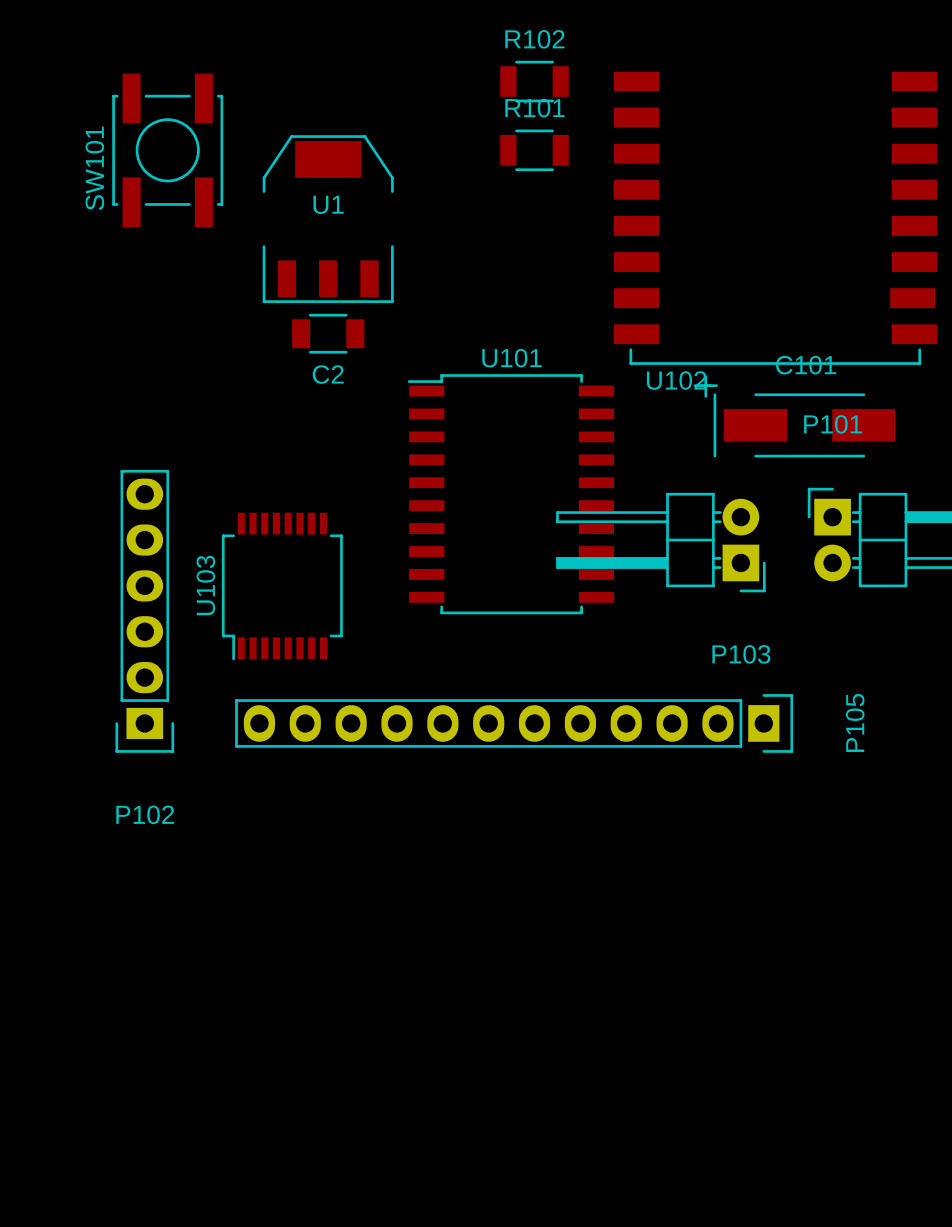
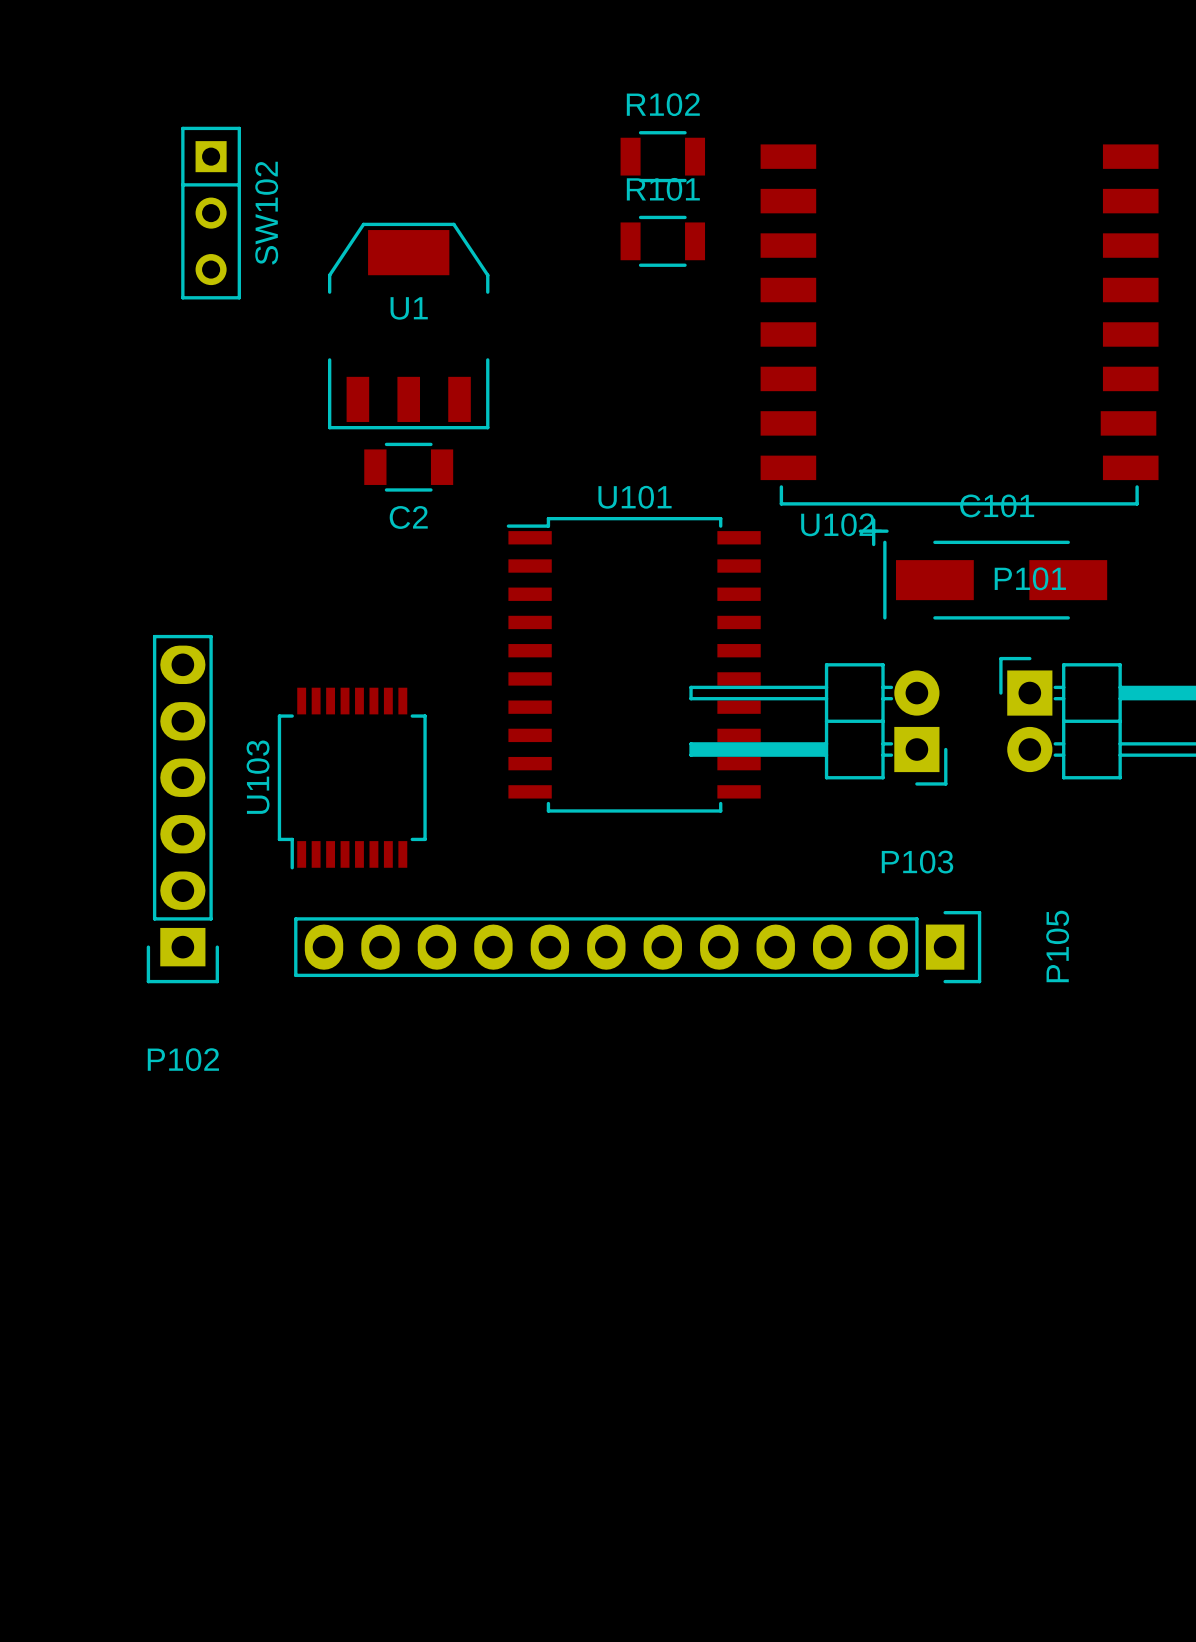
SW102: none -> (211, 213)
SW101: (167, 150) -> none

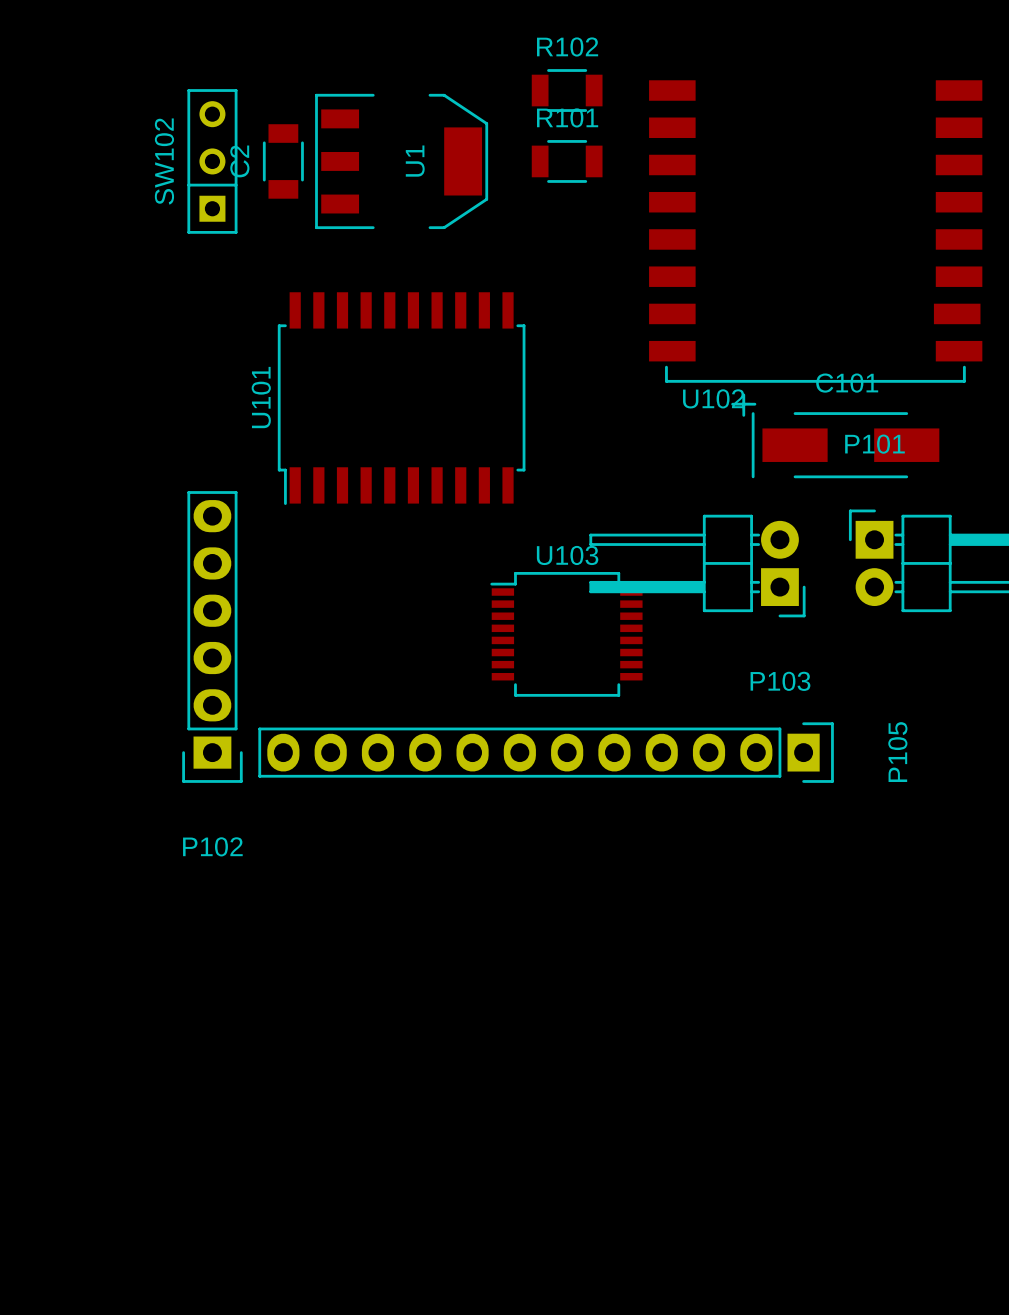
SW102 rotation: 0° (211, 213) -> 180° (212, 161)
U1 rotation: 0° (408, 326) -> 90° clockwise (401, 161)
C2 rotation: 0° (408, 467) -> 90° clockwise (283, 161)
C2 position: (408, 467) -> (283, 161)
U101 rotation: 0° (633, 664) -> 90° counterclockwise (401, 398)
U101 position: (633, 664) -> (401, 398)
U103 rotation: 0° (352, 778) -> 90° clockwise (566, 634)
U103 position: (352, 778) -> (566, 634)
P102 position: (182, 809) -> (212, 636)

